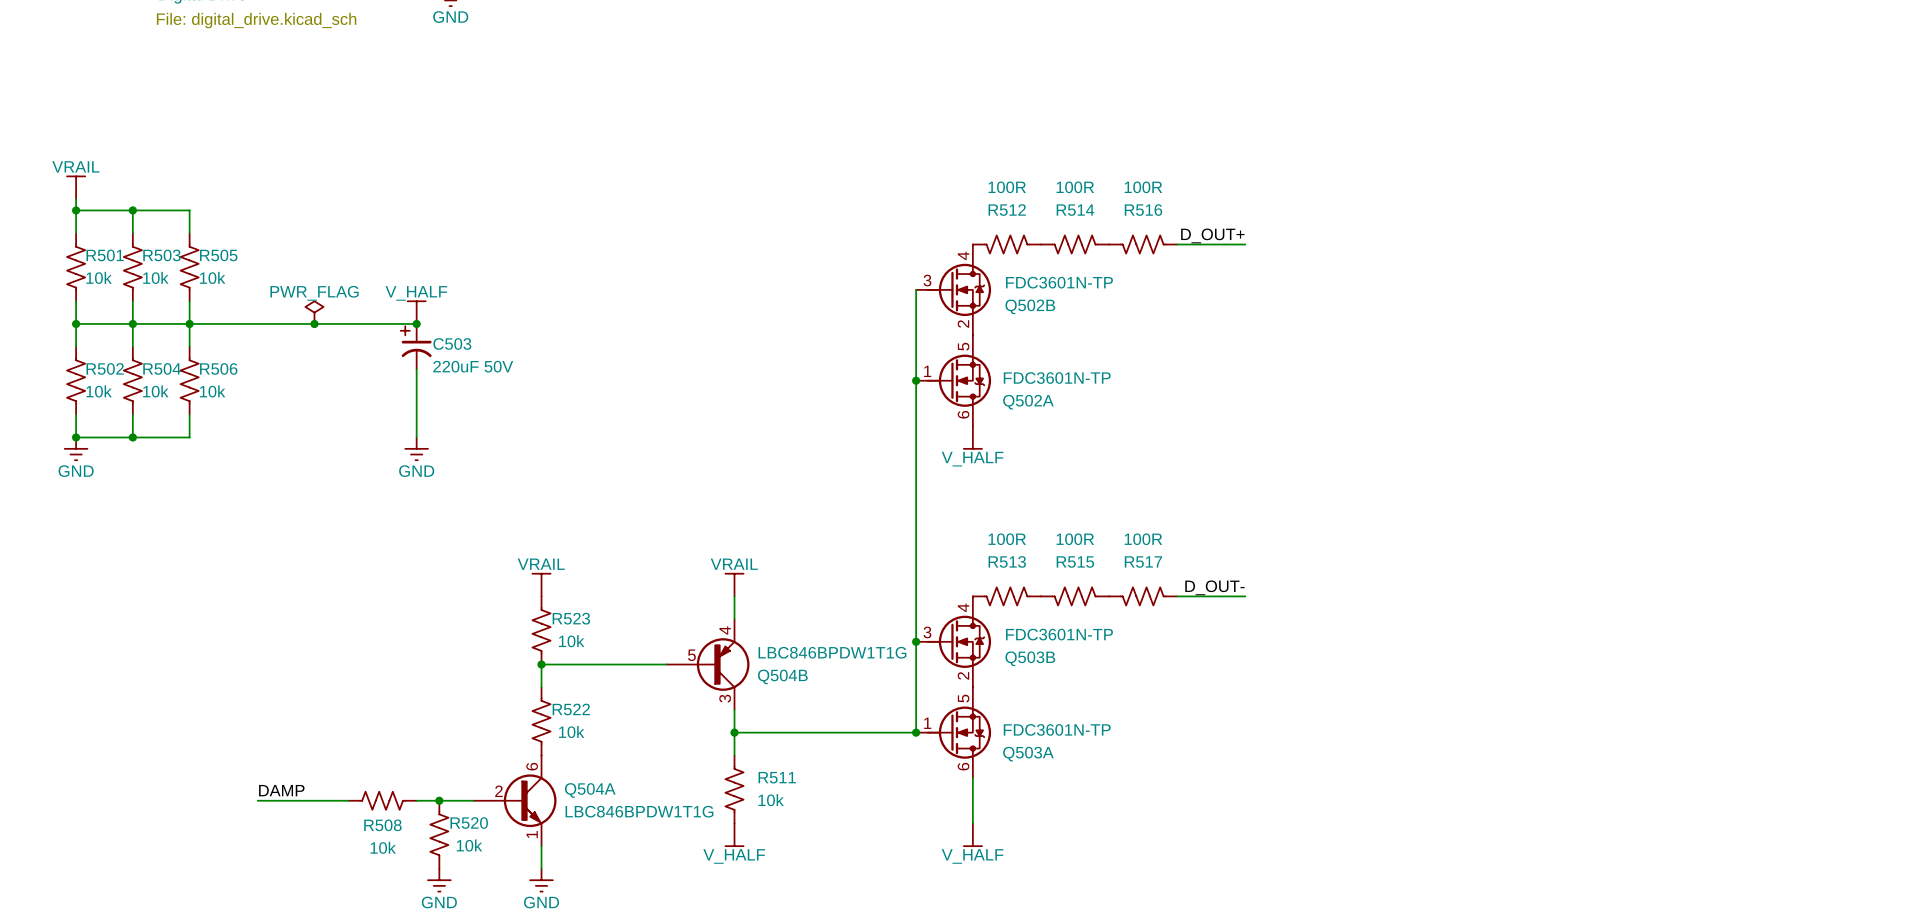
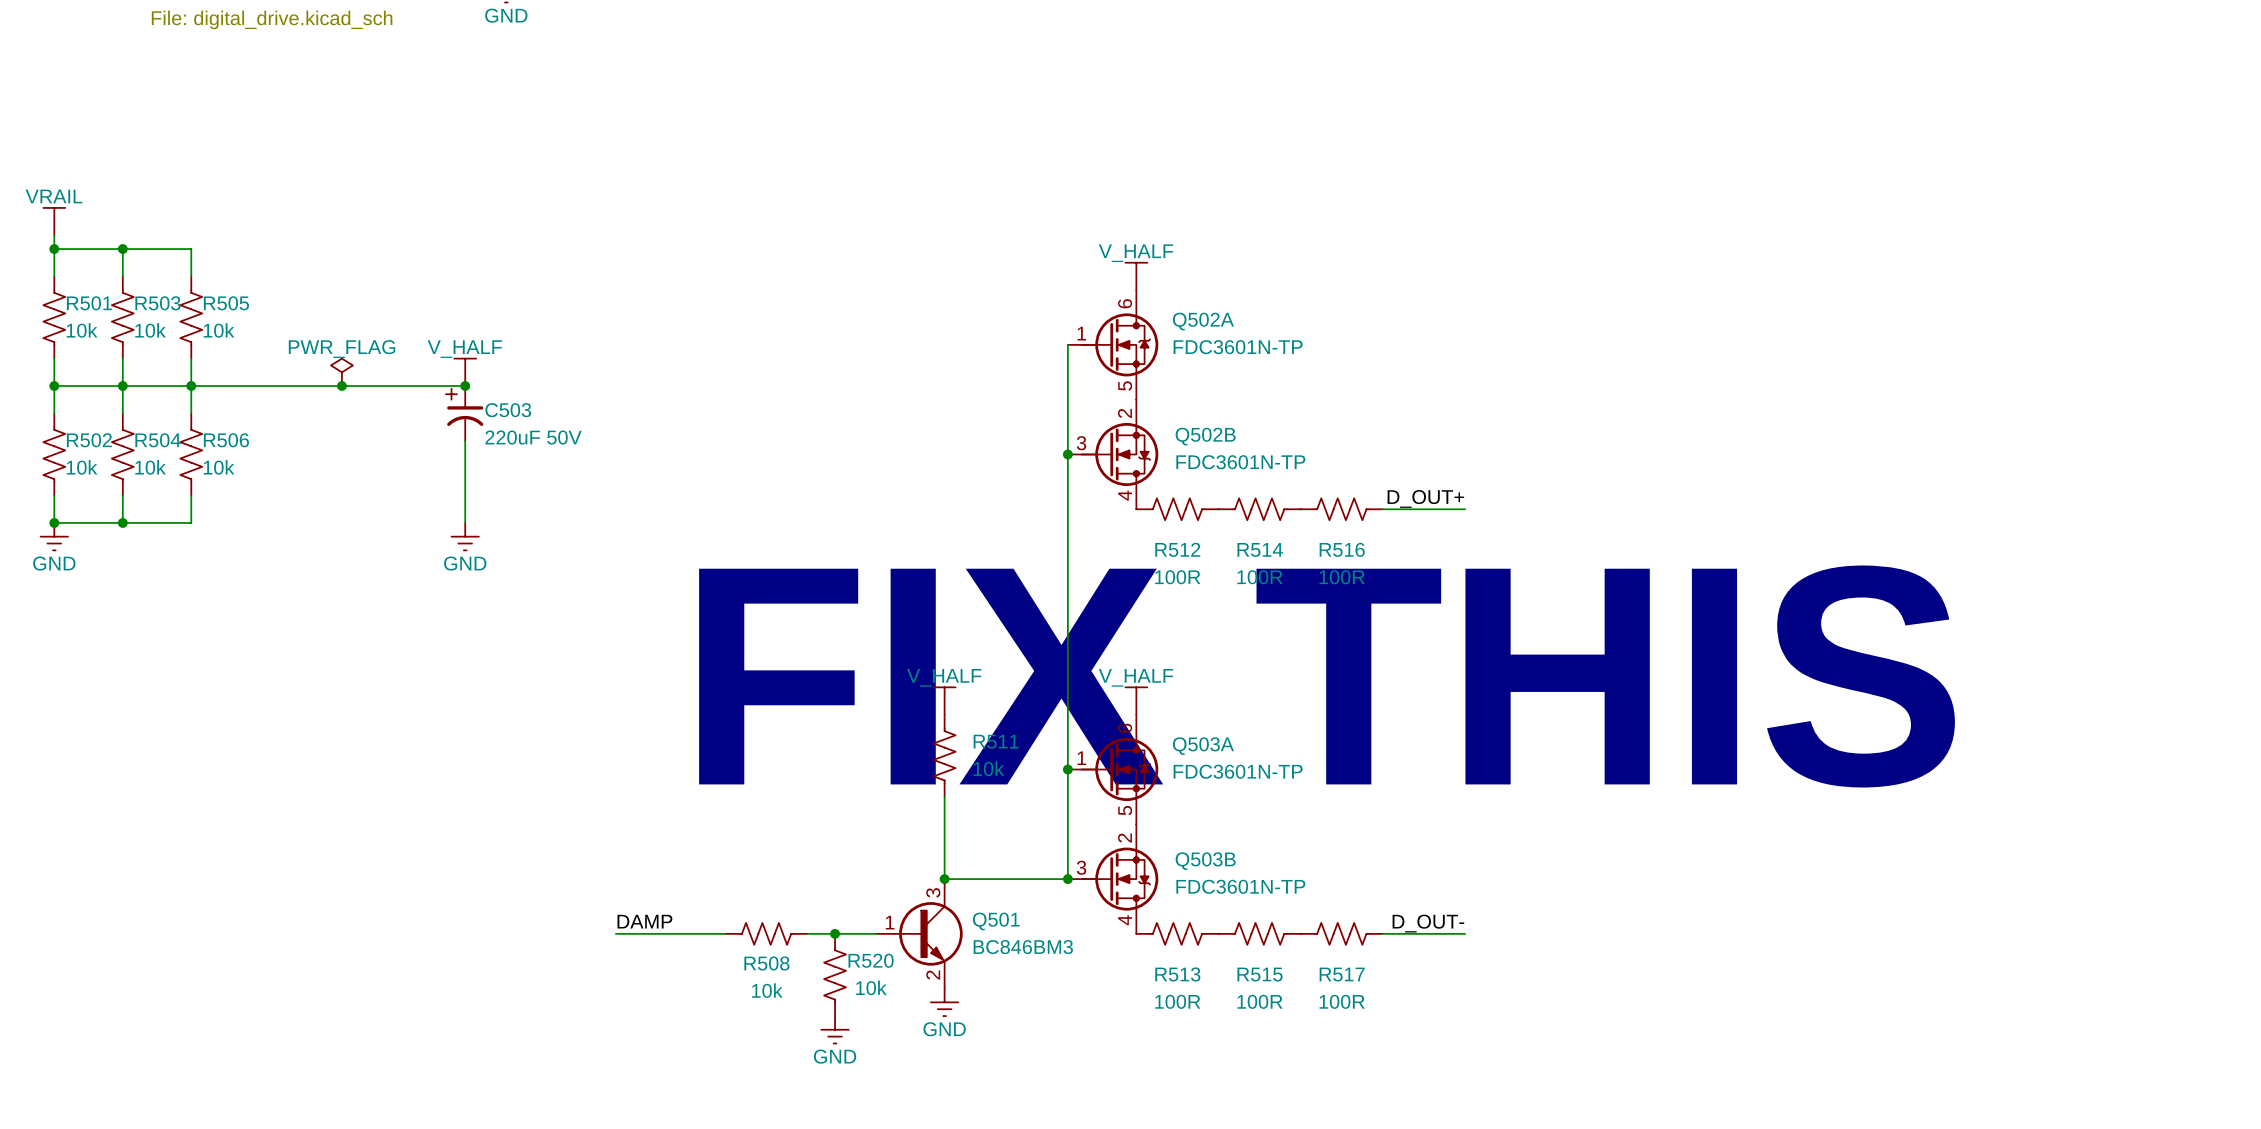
R512 value position: 100R (1007, 187) -> 100R (1177, 577)
R514 value position: 100R (1075, 187) -> 100R (1259, 577)
R516 value position: 100R (1143, 187) -> 100R (1342, 577)
R512 name position: R512 (1007, 210) -> R512 (1177, 549)
R514 name position: R514 (1075, 210) -> R514 (1260, 549)
R516 name position: R516 (1143, 210) -> R516 (1342, 549)
power symbol: none -> V_HALF (1136, 276)
label position: D_OUT+ (1212, 235) -> D_OUT+ (1425, 498)
R512 flip: as is (1006, 244) -> left-right (1177, 509)
R512 position: (1006, 244) -> (1177, 509)
R514 flip: as is (1075, 244) -> left-right (1259, 509)
R514 position: (1075, 244) -> (1259, 509)
R516 flip: as is (1143, 244) -> left-right (1341, 509)
R516 position: (1143, 244) -> (1341, 509)
wire: (1177, 244) (1245, 244) -> (1382, 509) (1465, 509)
Q502B position: (953, 289) -> (1113, 454)
Q502B flip: as is (959, 289) -> up-down (1119, 454)
Q502A position: (953, 380) -> (1113, 344)
Q502A flip: as is (959, 380) -> up-down (1119, 344)
power symbol: V_HALF (972, 437) -> none
R513 value position: 100R (1007, 539) -> 100R (1177, 1001)
R515 value position: 100R (1075, 539) -> 100R (1259, 1001)
R517 value position: 100R (1143, 539) -> 100R (1342, 1001)
R513 name position: R513 (1007, 561) -> R513 (1177, 974)
R515 name position: R515 (1075, 562) -> R515 (1260, 974)
R517 name position: R517 (1143, 562) -> R517 (1342, 974)
text: none -> FIX THIS (1327, 676)
power symbol: VRAIL (541, 585) -> none
power symbol: VRAIL (734, 585) -> none
power symbol: none -> V_HALF (944, 701)
power symbol: none -> V_HALF (1136, 701)
label position: D_OUT- (1214, 587) -> D_OUT- (1428, 923)
wire: (734, 596) (734, 619) -> none
R513 flip: as is (1006, 596) -> left-right (1177, 933)
R513 position: (1006, 596) -> (1177, 933)
R515 flip: as is (1075, 596) -> left-right (1259, 933)
R515 position: (1075, 596) -> (1259, 933)
R517 flip: as is (1143, 596) -> left-right (1341, 933)
R517 position: (1143, 596) -> (1341, 933)
wire: (1177, 596) (1245, 596) -> (1382, 933) (1465, 933)
R523: 10k (541, 630) -> none
Q503B position: (953, 641) -> (1113, 879)
Q503B flip: as is (959, 641) -> up-down (1119, 879)
junction: (541, 664) -> none
wire: (666, 664) (541, 664) (541, 687) -> none
Q504B: LBC846BPDW1T1G (707, 664) -> none
wire: (734, 709) (734, 755) -> none
R522: 10k (541, 721) -> none
wire: (734, 732) (813, 732) -> (944, 796) (944, 879)
junction: (734, 732) -> none
junction: none -> (944, 879)
Q503A position: (953, 732) -> (1113, 769)
Q503A flip: as is (959, 732) -> up-down (1119, 769)
label: none -> DAMP (644, 921)
wire: none -> (615, 933) (725, 933)
wire: none -> (807, 933) (876, 933)
junction: none -> (835, 933)
Q501: none -> BC846BM3 (919, 933)
wire: (972, 778) (972, 823) -> none
R511 position: (734, 789) -> (944, 755)
label: DAMP (281, 790) -> none
wire: (257, 800) (348, 800) -> none
R508 position: (382, 800) -> (766, 933)
wire: (416, 800) (473, 800) -> none
junction: (439, 800) -> none
Q504A: LBC846BPDW1T1G (514, 800) -> none
R520 position: (439, 834) -> (835, 974)
power symbol: V_HALF (734, 834) -> none
power symbol: none -> GND (944, 1002)
power symbol: V_HALF (972, 834) -> none
wire: (541, 846) (541, 868) -> none
power symbol: none -> GND (835, 1029)
power symbol: GND (439, 880) -> none
power symbol: GND (541, 880) -> none

